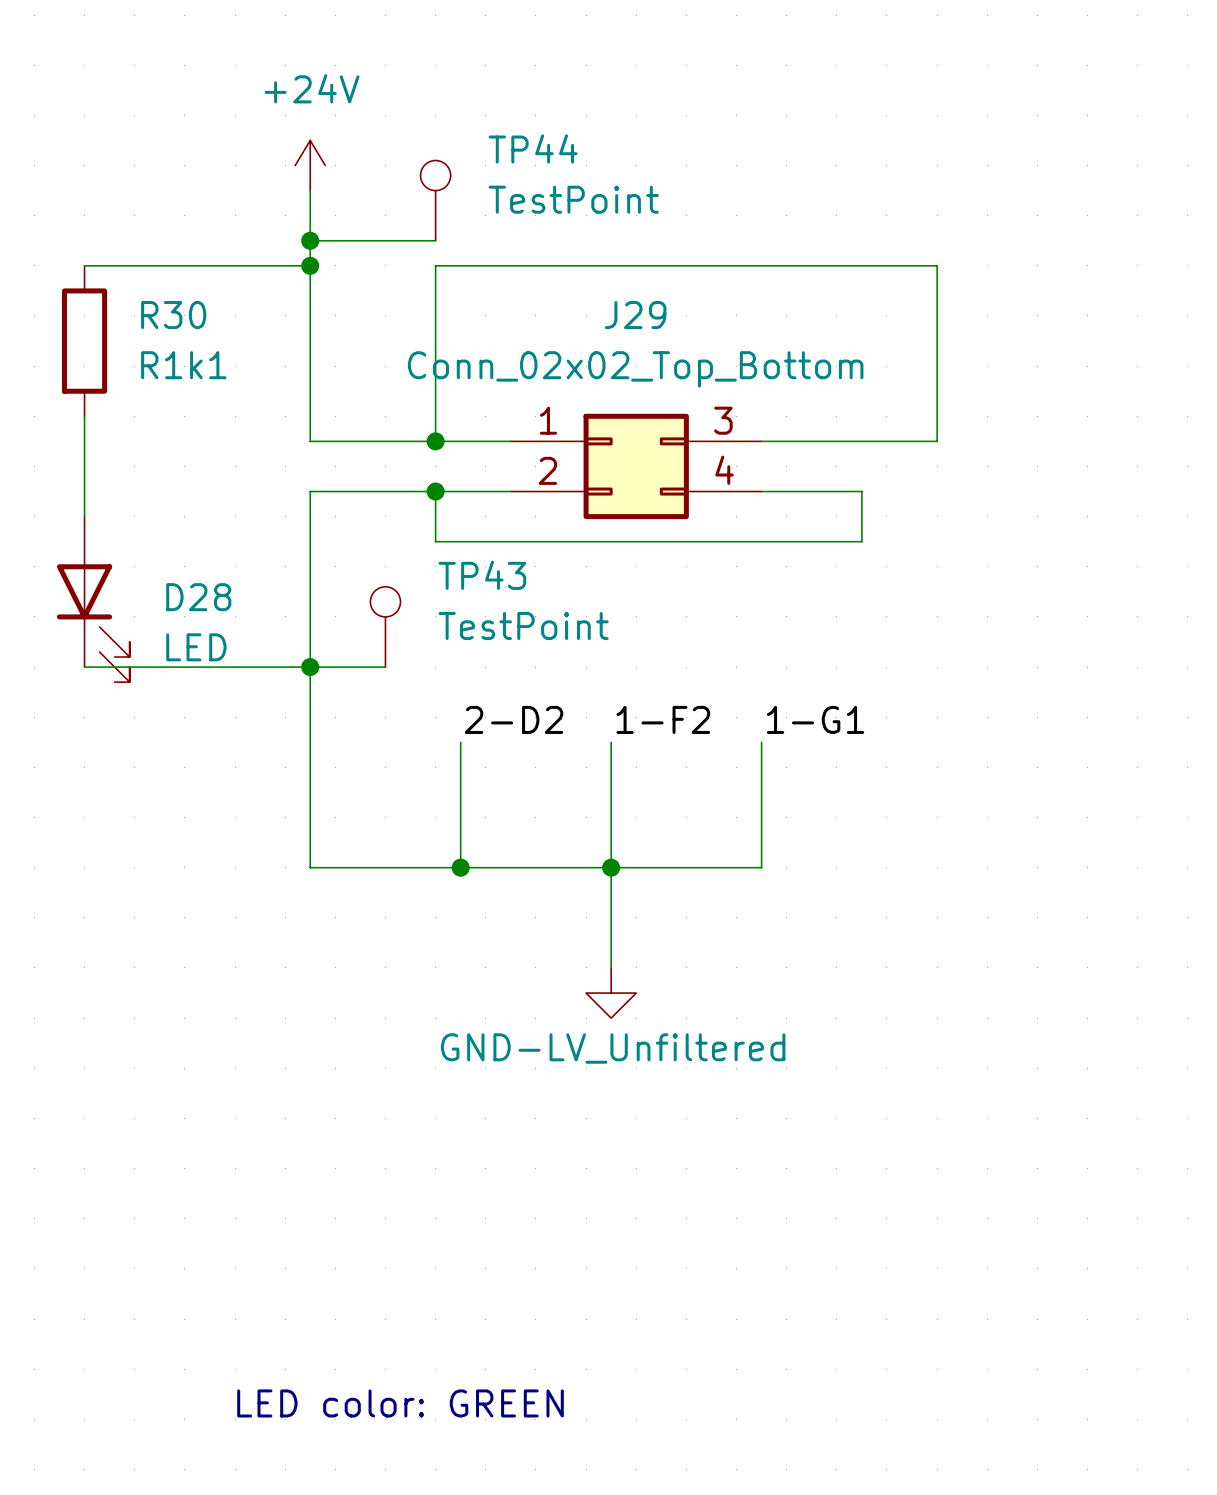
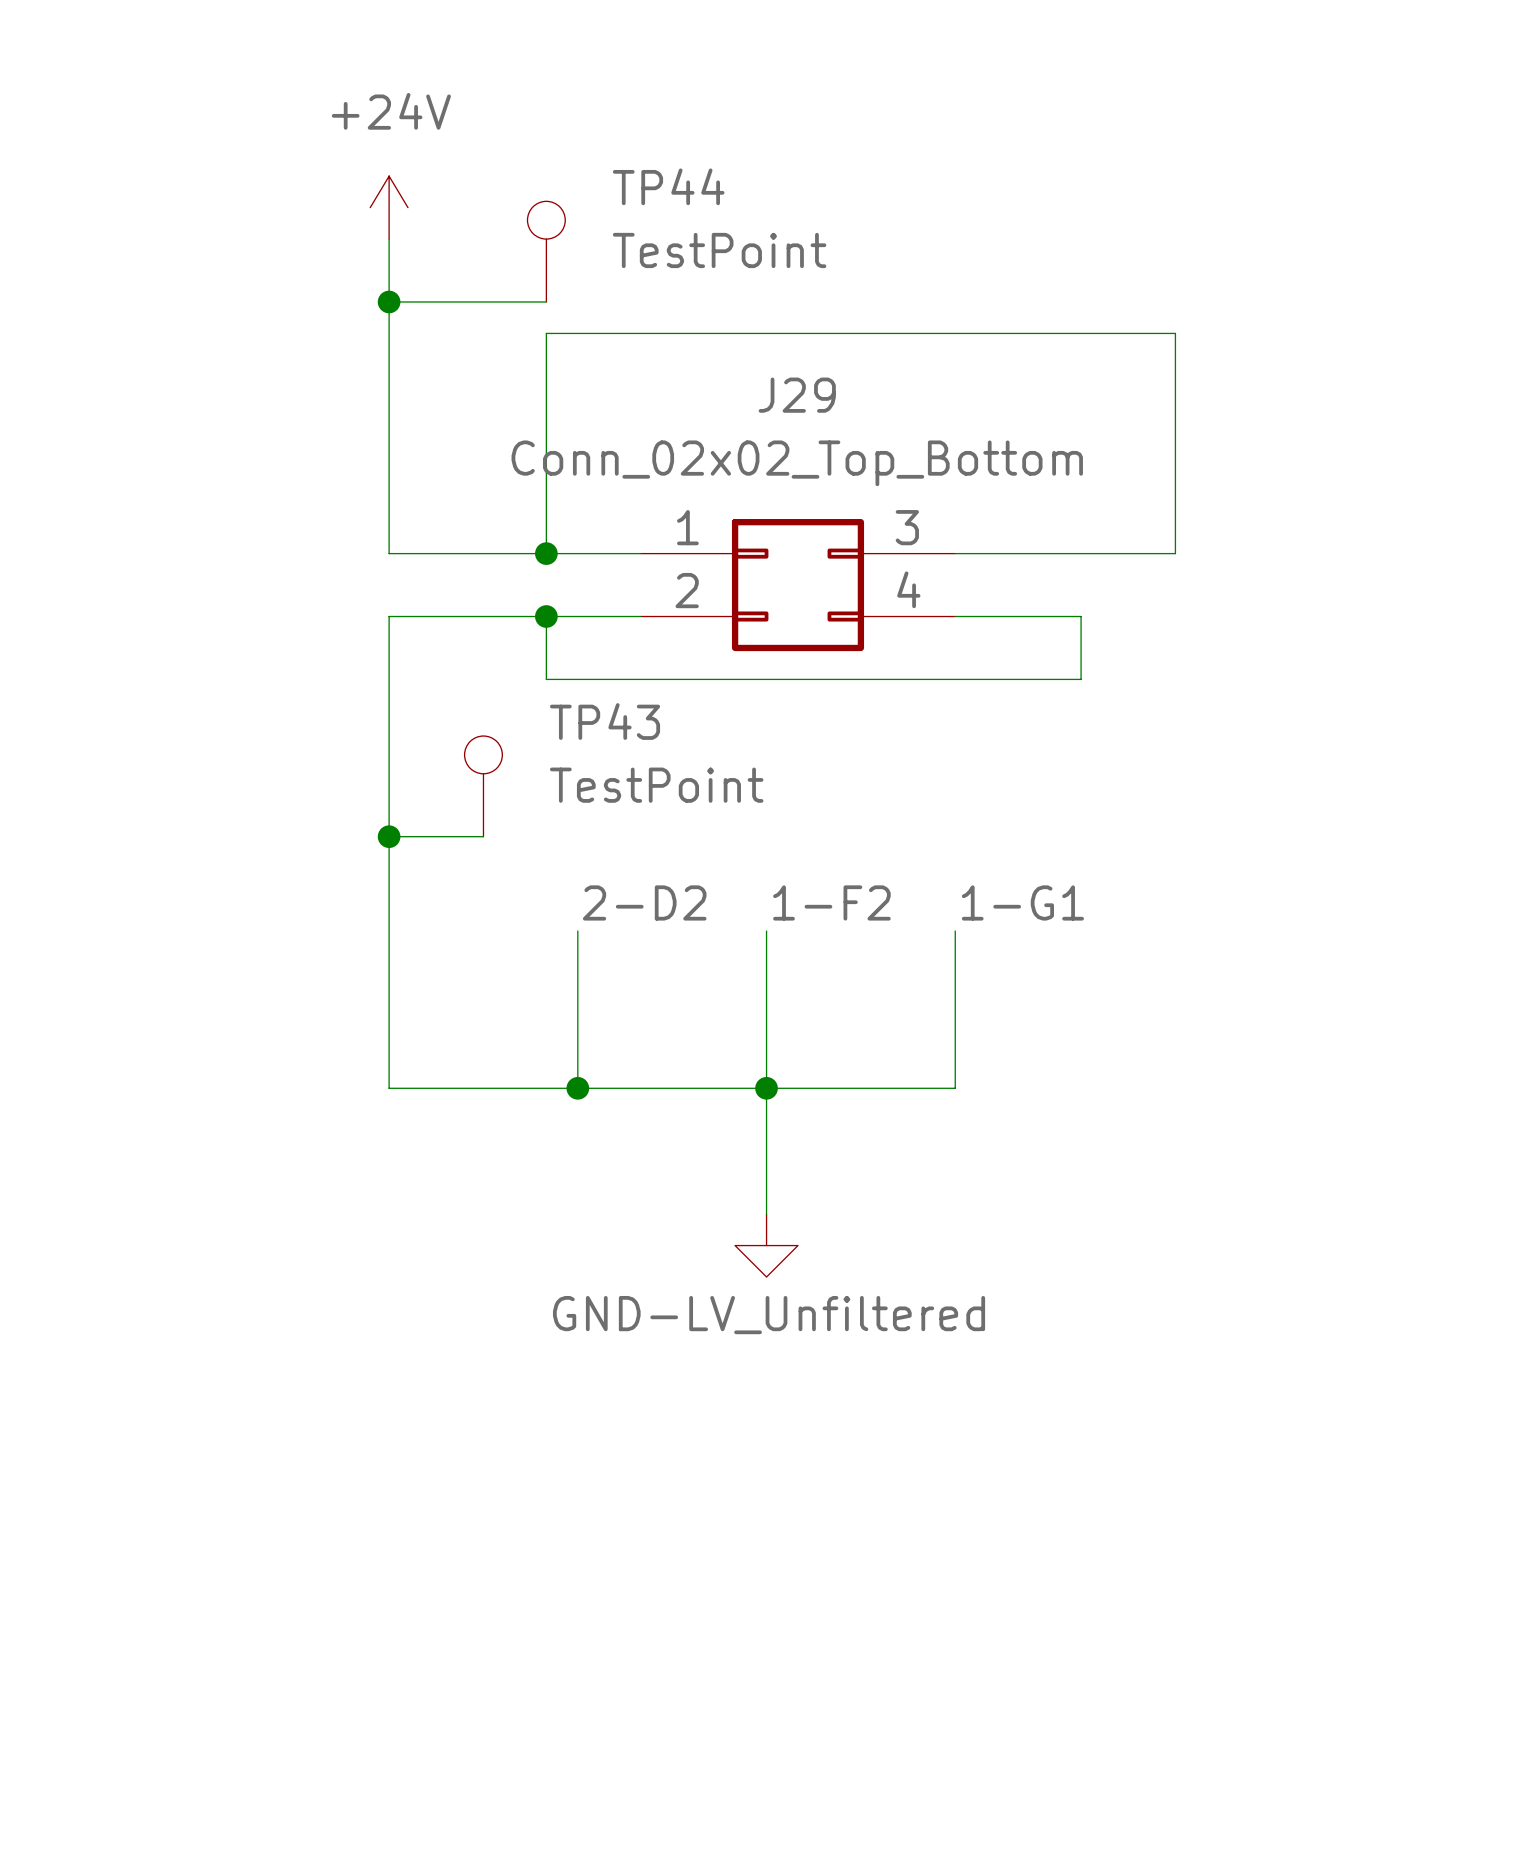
wire: (84, 265) (310, 265) -> none
junction: (310, 265) -> none
R30: R1k1 (84, 341) -> none
wire: (84, 416) (84, 516) -> none
D28: LED (93, 599) -> none
wire: (84, 667) (310, 667) -> none
text: LED color: GREEN (400, 1403) -> none

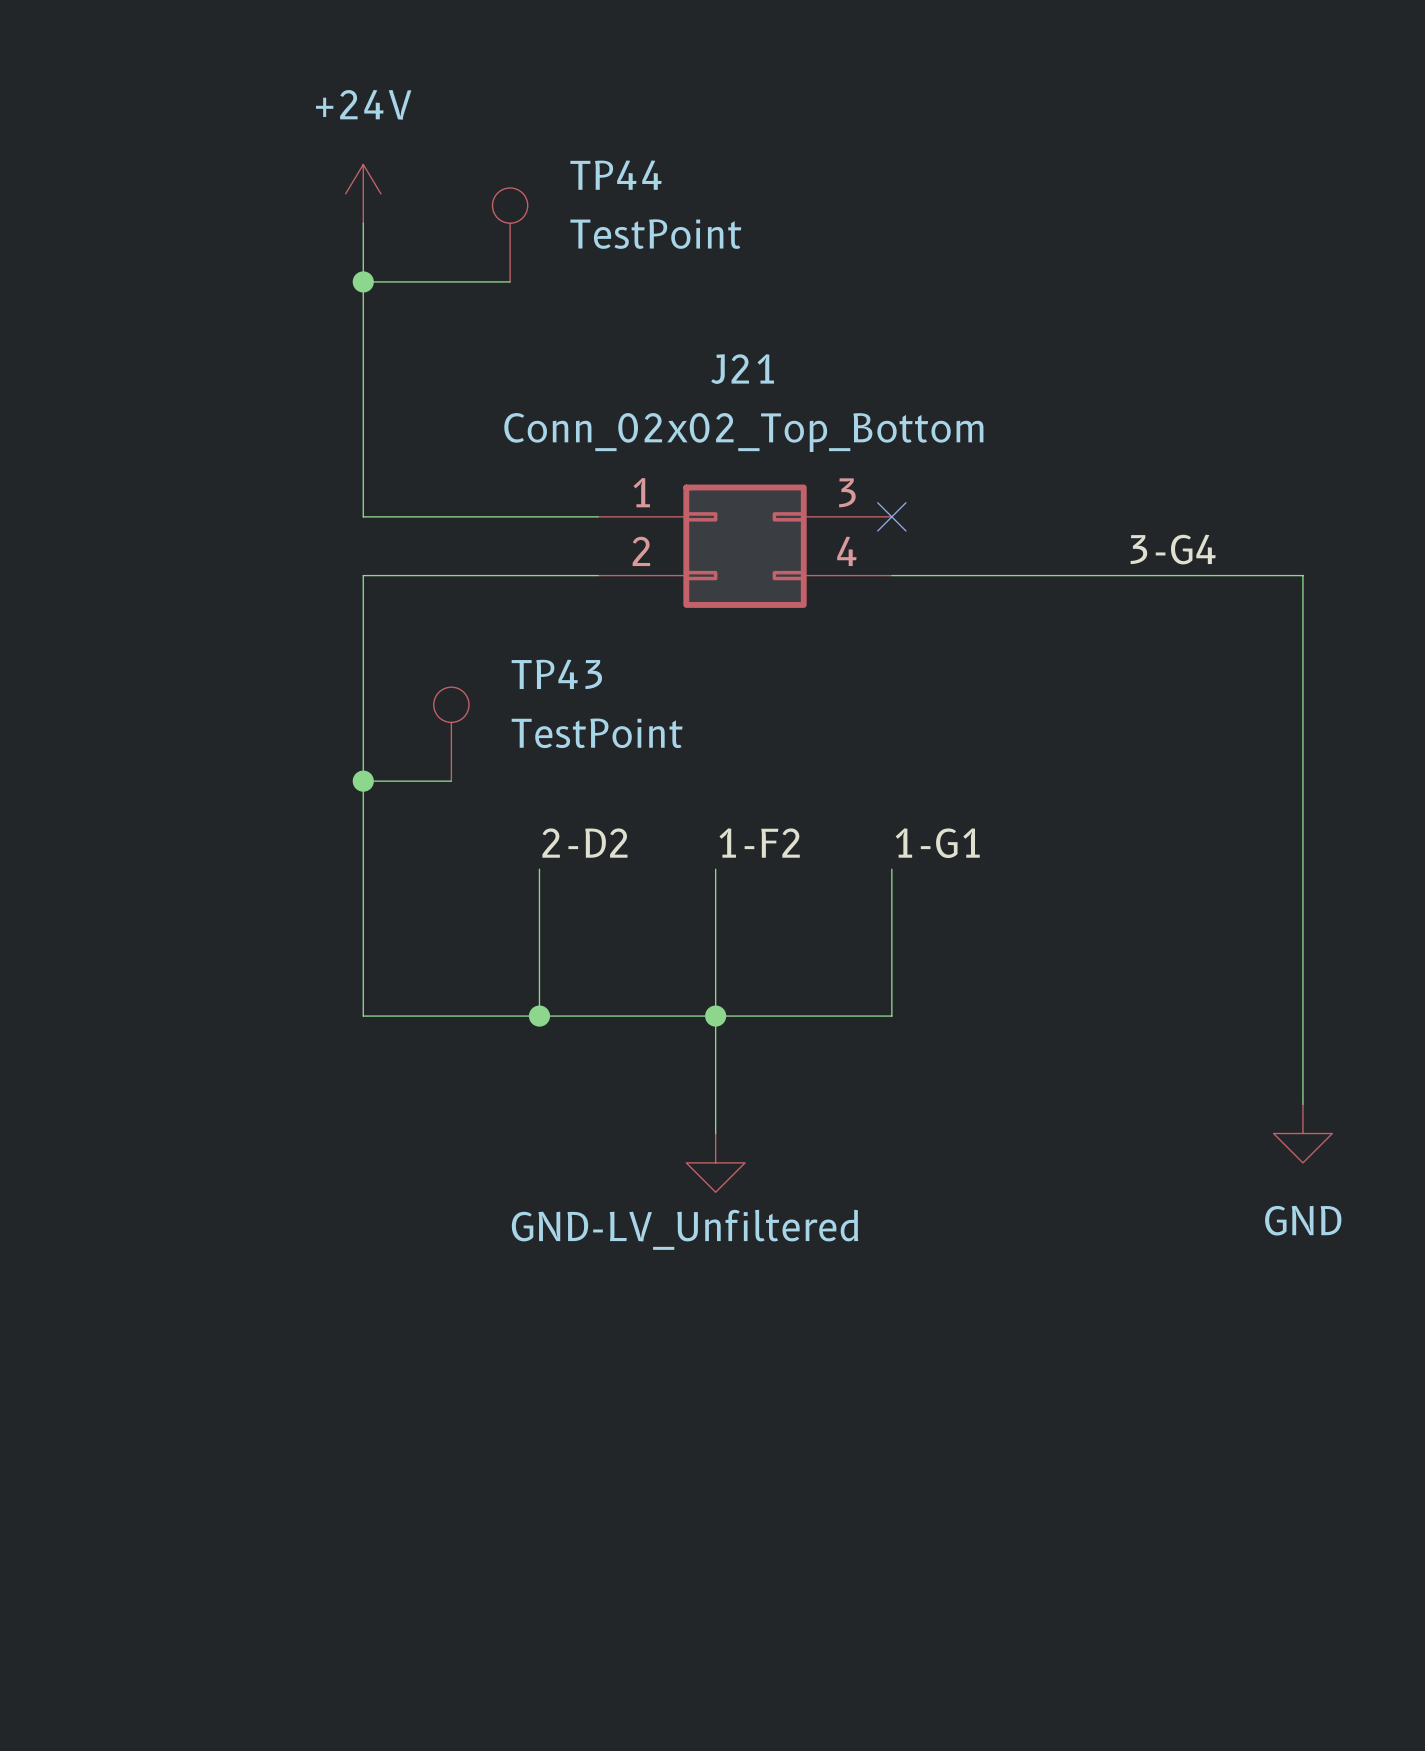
J29 name: J29 (797, 395) -> J21 (742, 369)
wire: (546, 553) (546, 333) (1175, 333) (1175, 553) (955, 553) -> none
junction: (546, 553) -> none
no-connect mark: none -> (891, 516)
label: none -> 3-G4 (1173, 549)
wire: (546, 616) (546, 679) (1081, 679) (1081, 616) -> (1302, 1104) (1302, 575) (1009, 575)
junction: (546, 616) -> none
power symbol: none -> GND (1302, 1133)

